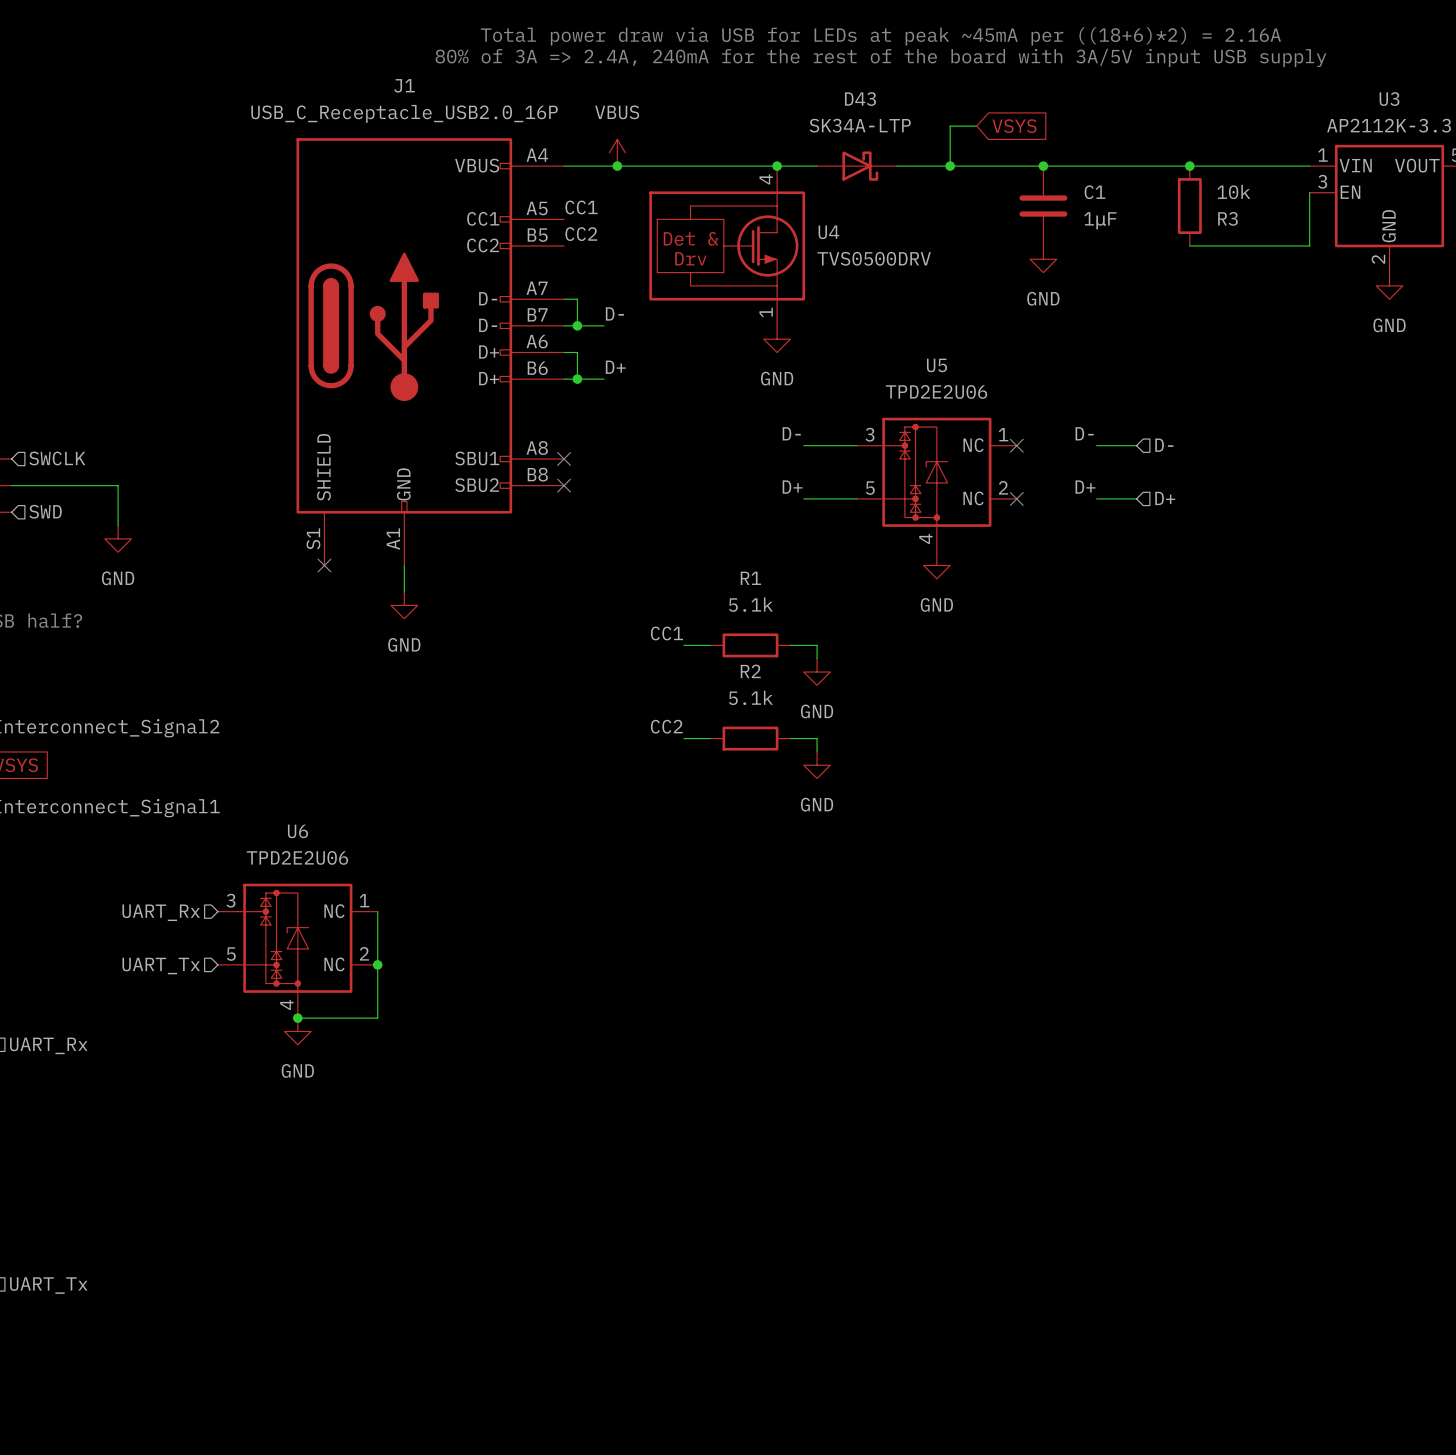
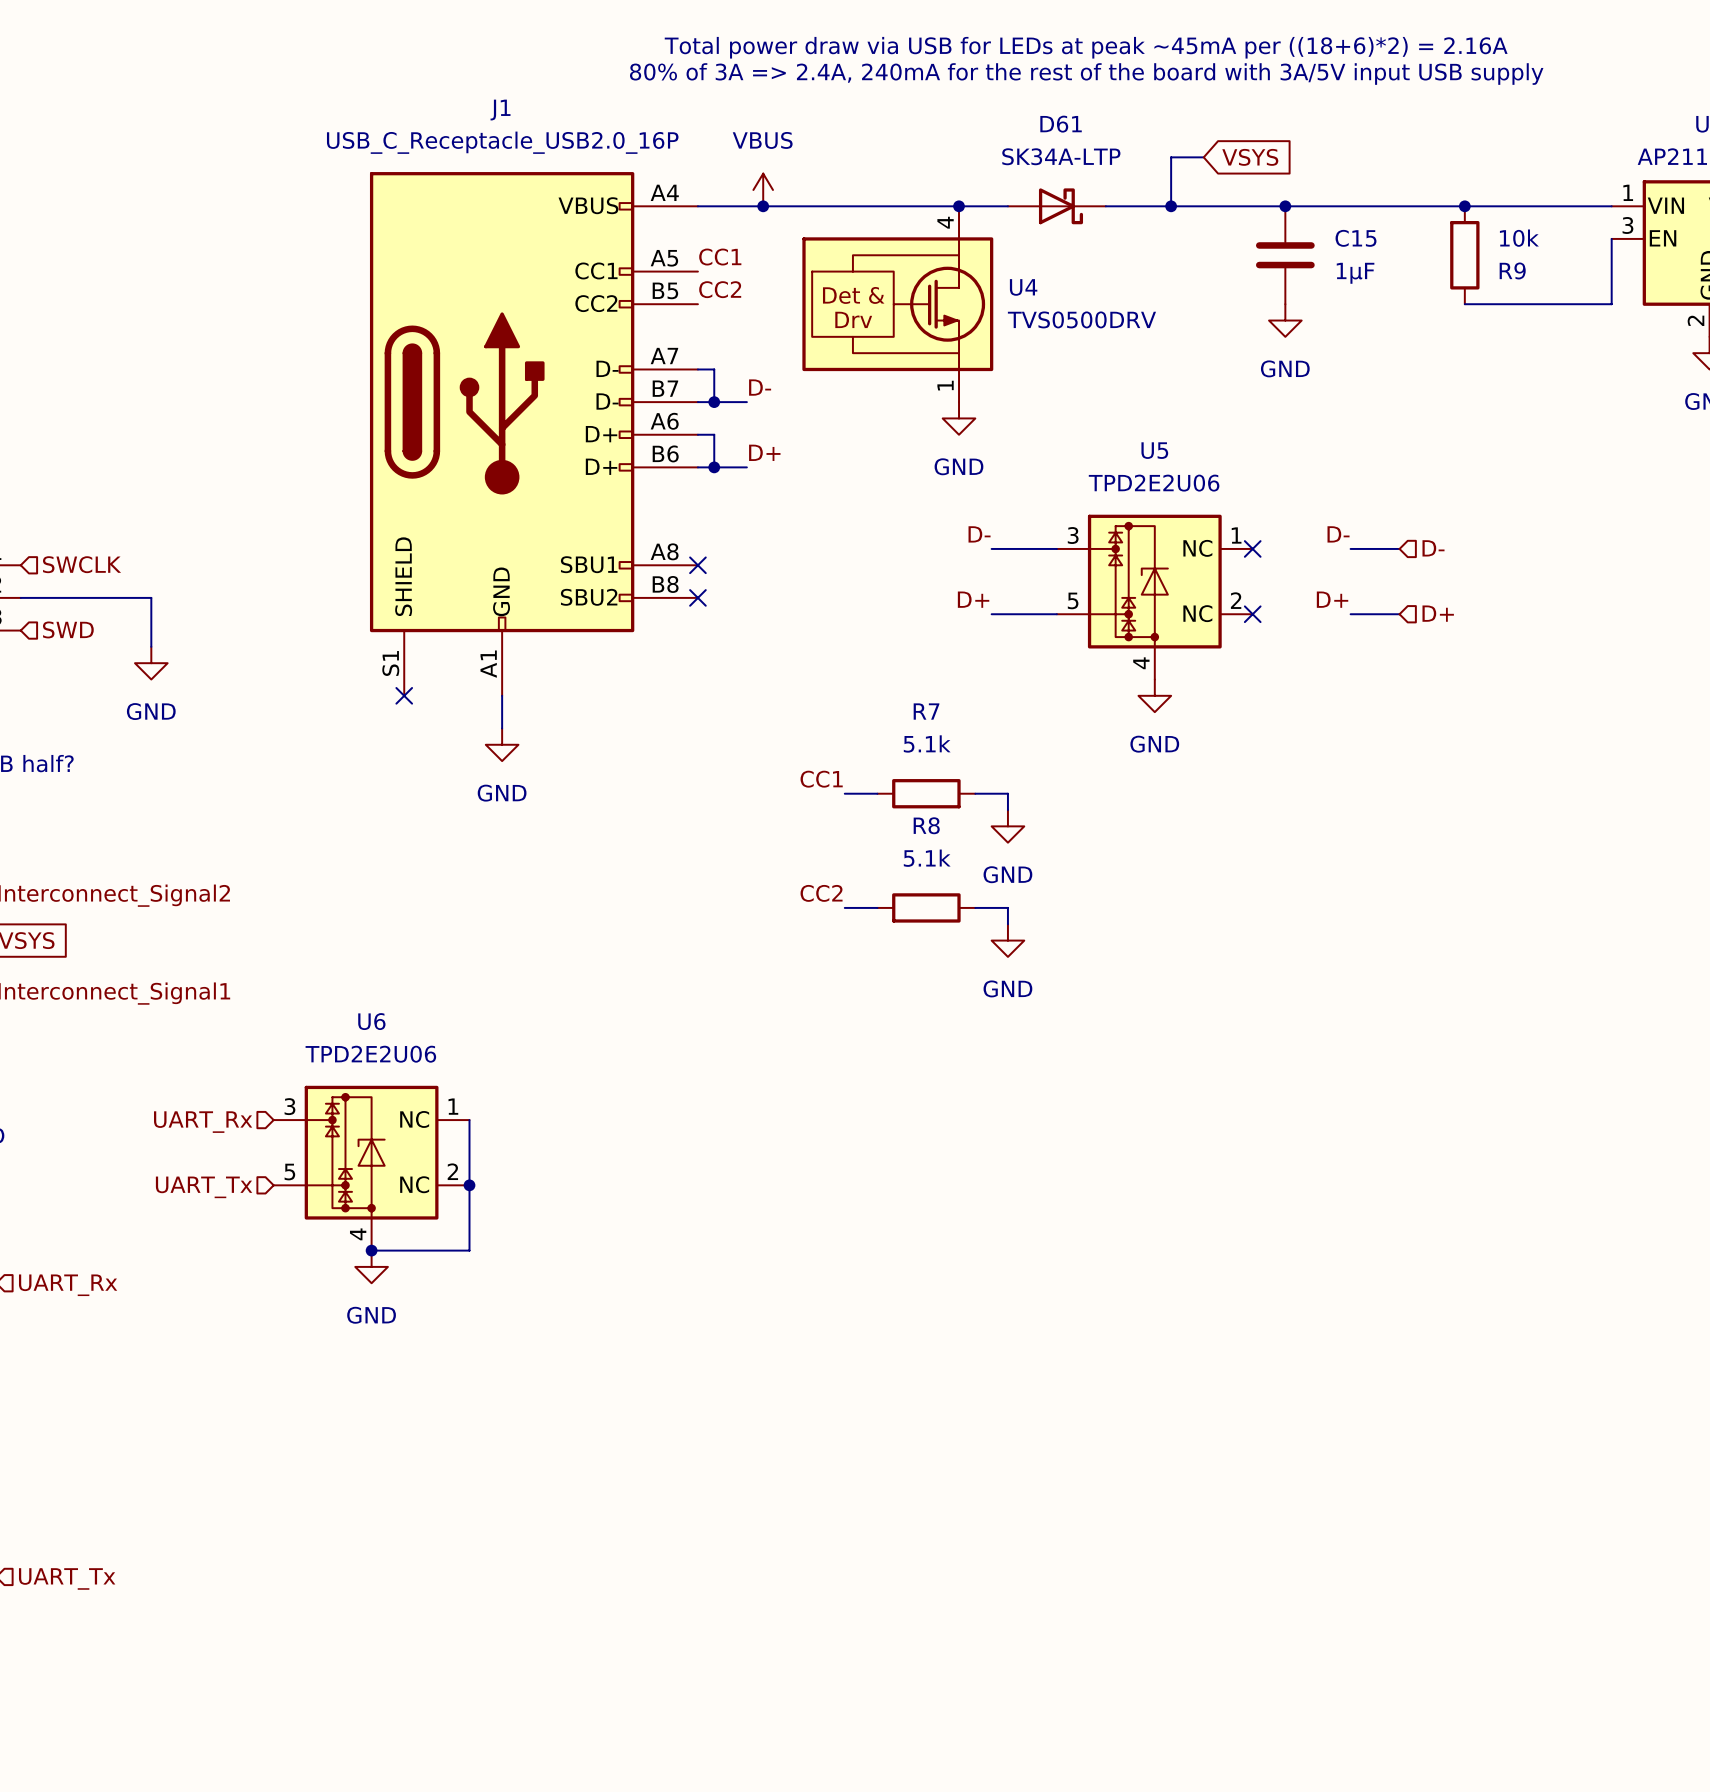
D43 name: D43 (860, 99) -> D61 (1061, 124)
C1 name: C1 (1094, 192) -> C15 (1356, 238)
R3 name: R3 (1227, 218) -> R9 (1512, 270)
R1 name: R1 (750, 578) -> R7 (926, 711)
R2 name: R2 (750, 671) -> R8 (926, 825)

